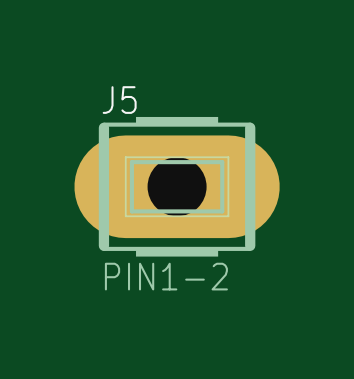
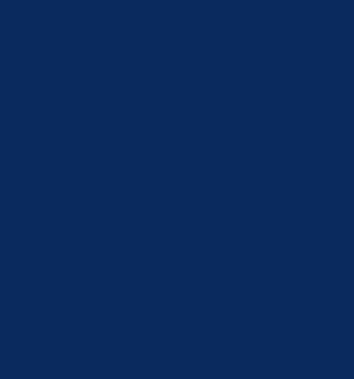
J5: PIN1-2 (177, 186) -> none

